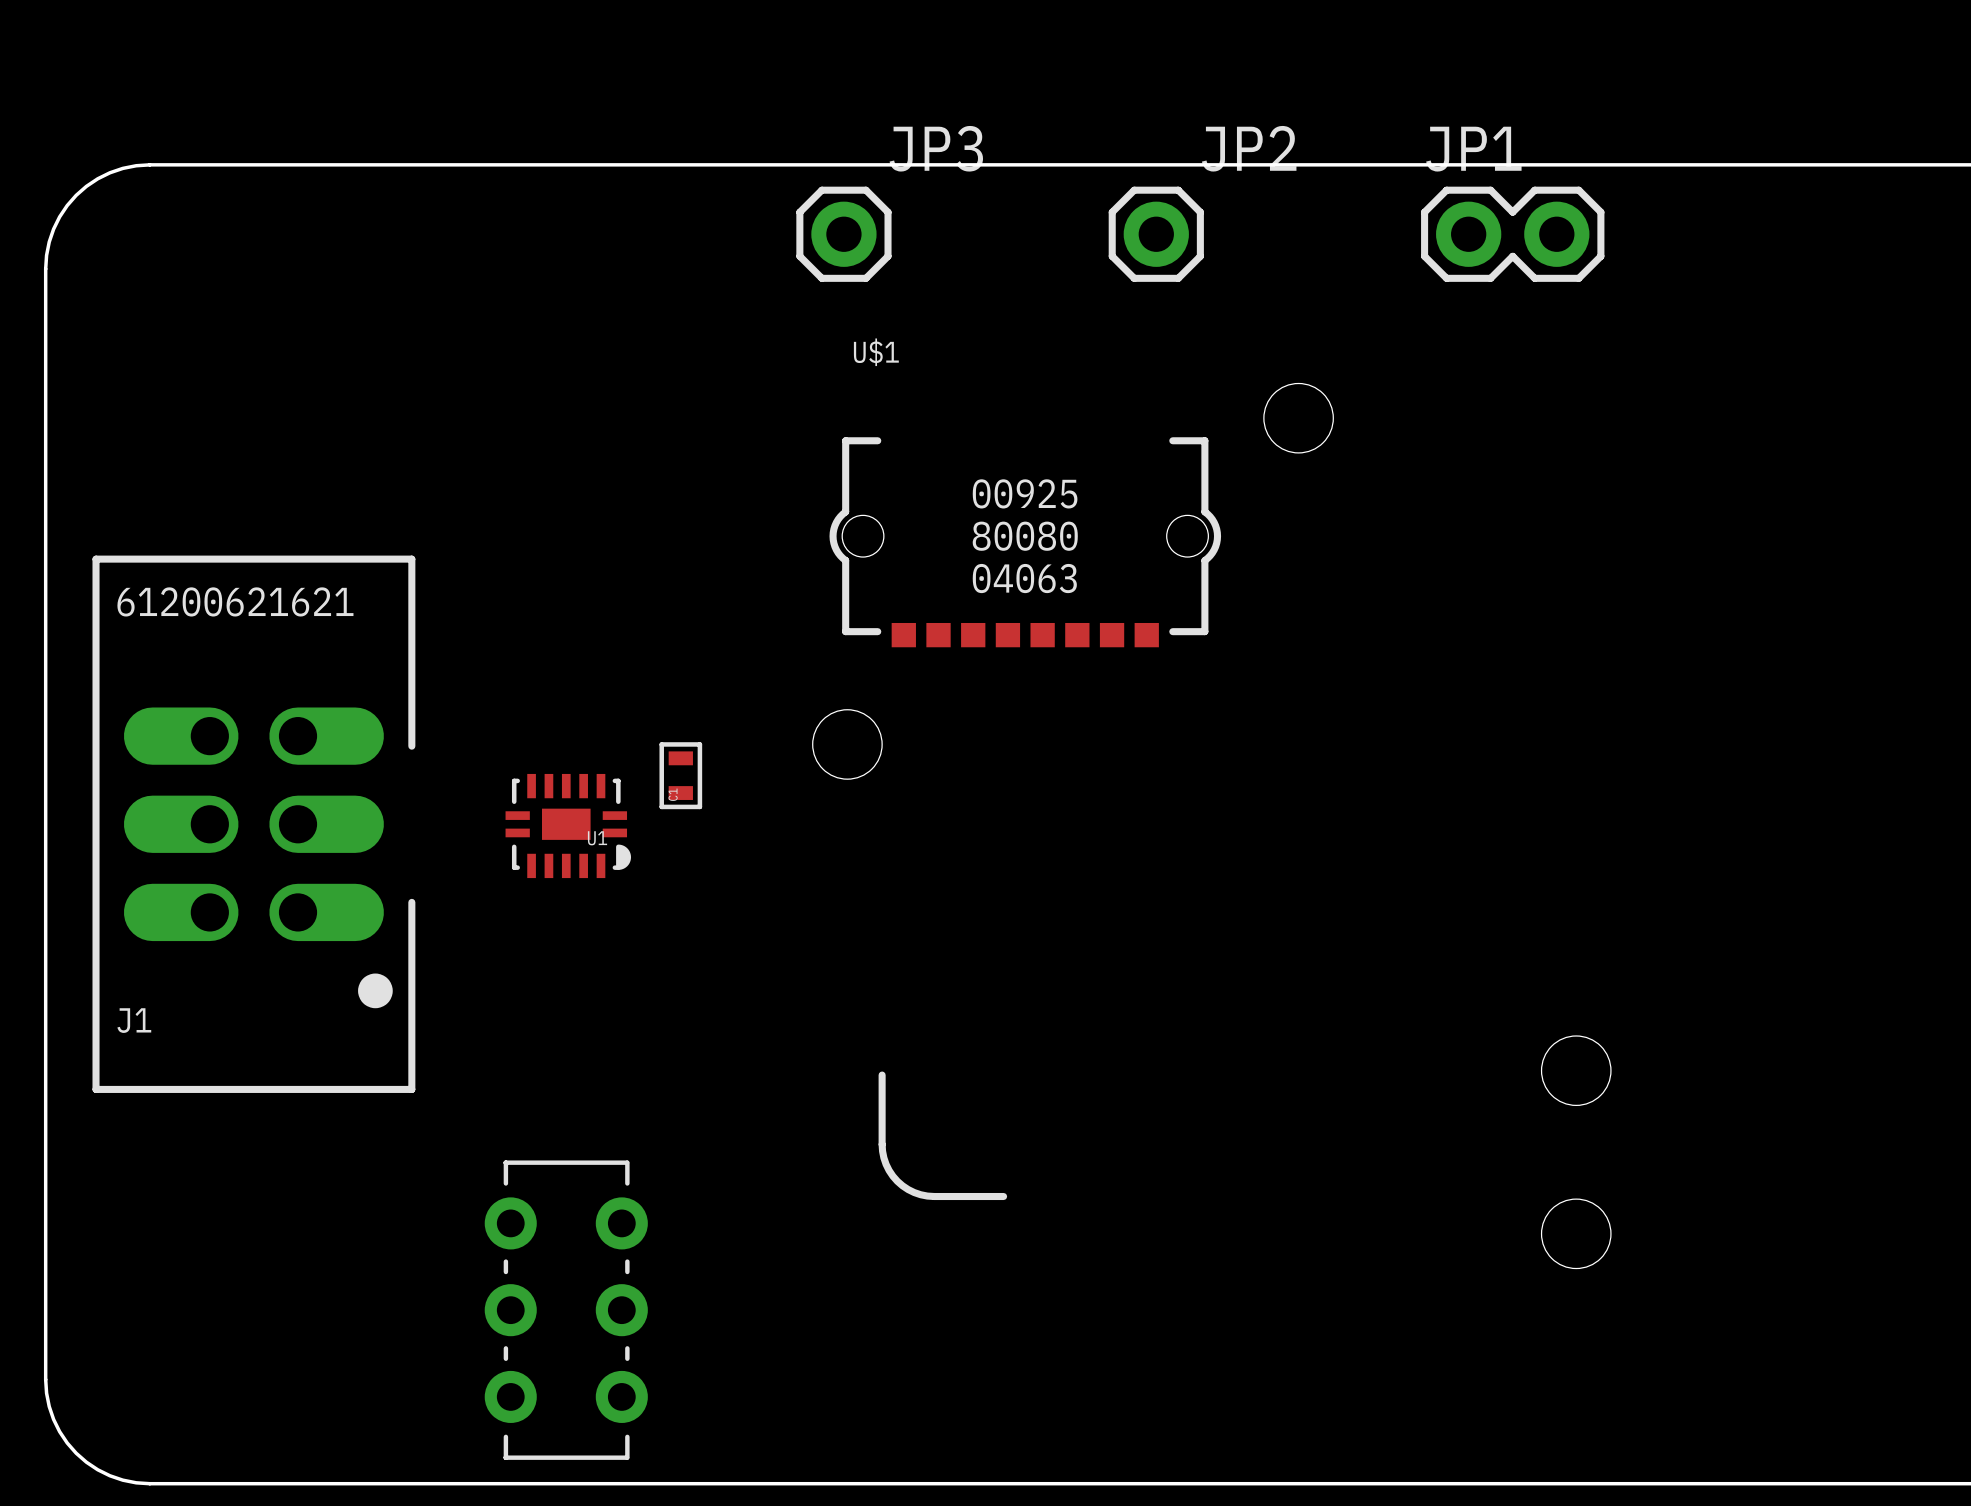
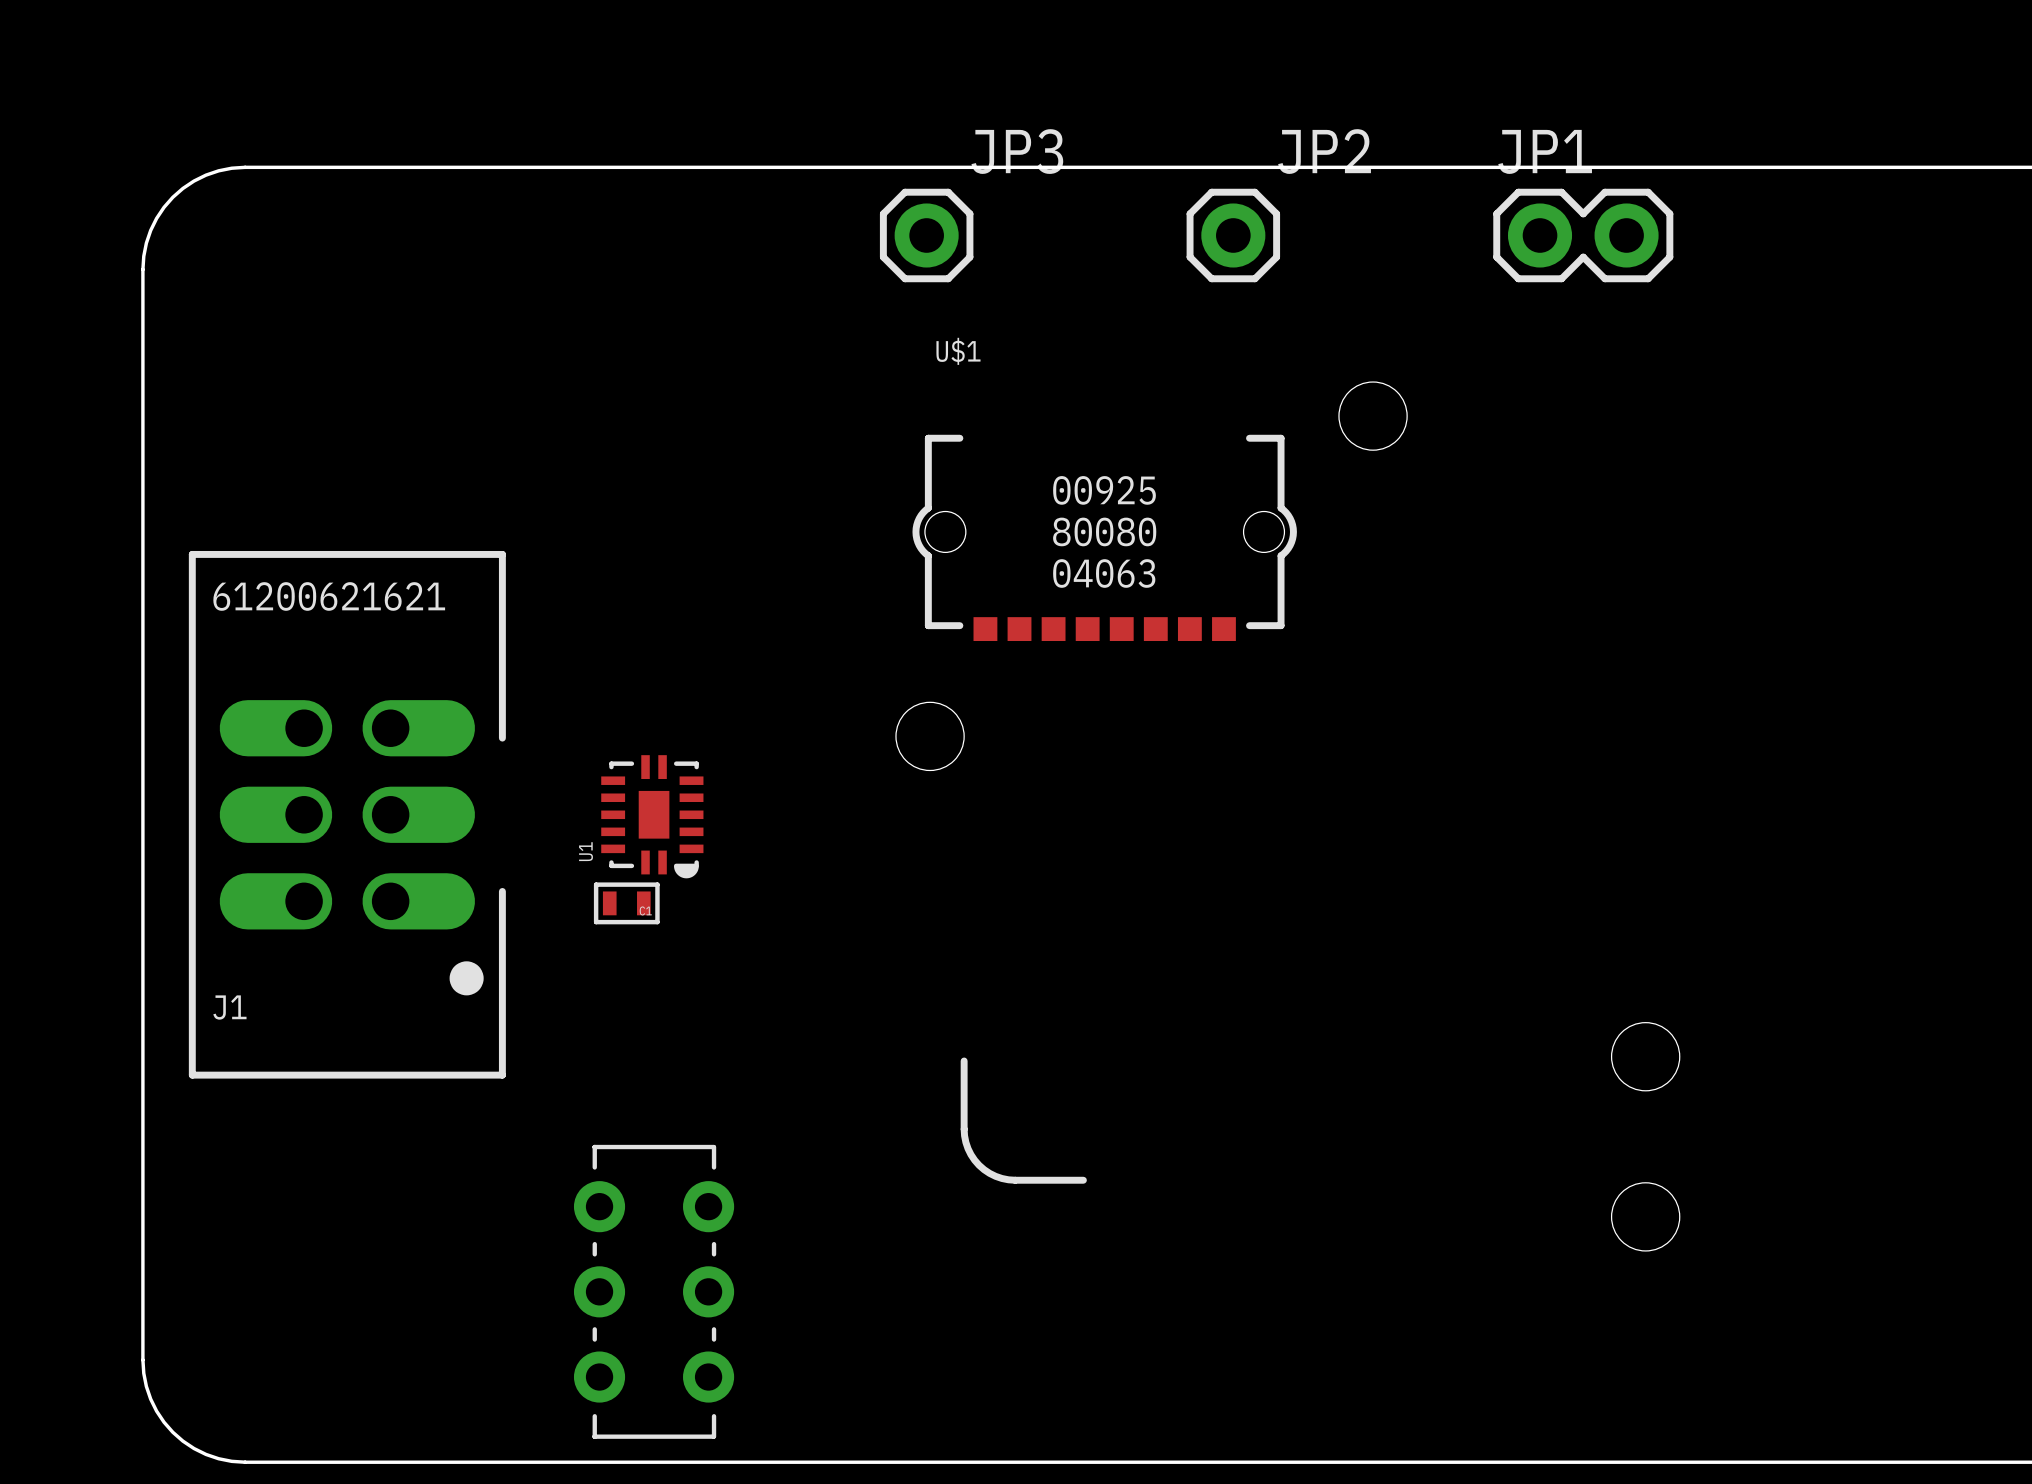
U1 footprint: [505, 773, 632, 879] -> [601, 755, 704, 879]
C1 rotation: 0° (680, 775) -> 90° clockwise (626, 903)
C1 position: (680, 775) -> (626, 903)
U1 name rotation: 0° (597, 838) -> 90° counterclockwise (586, 851)
U1 name position: U1 (597, 838) -> U1 (586, 851)

